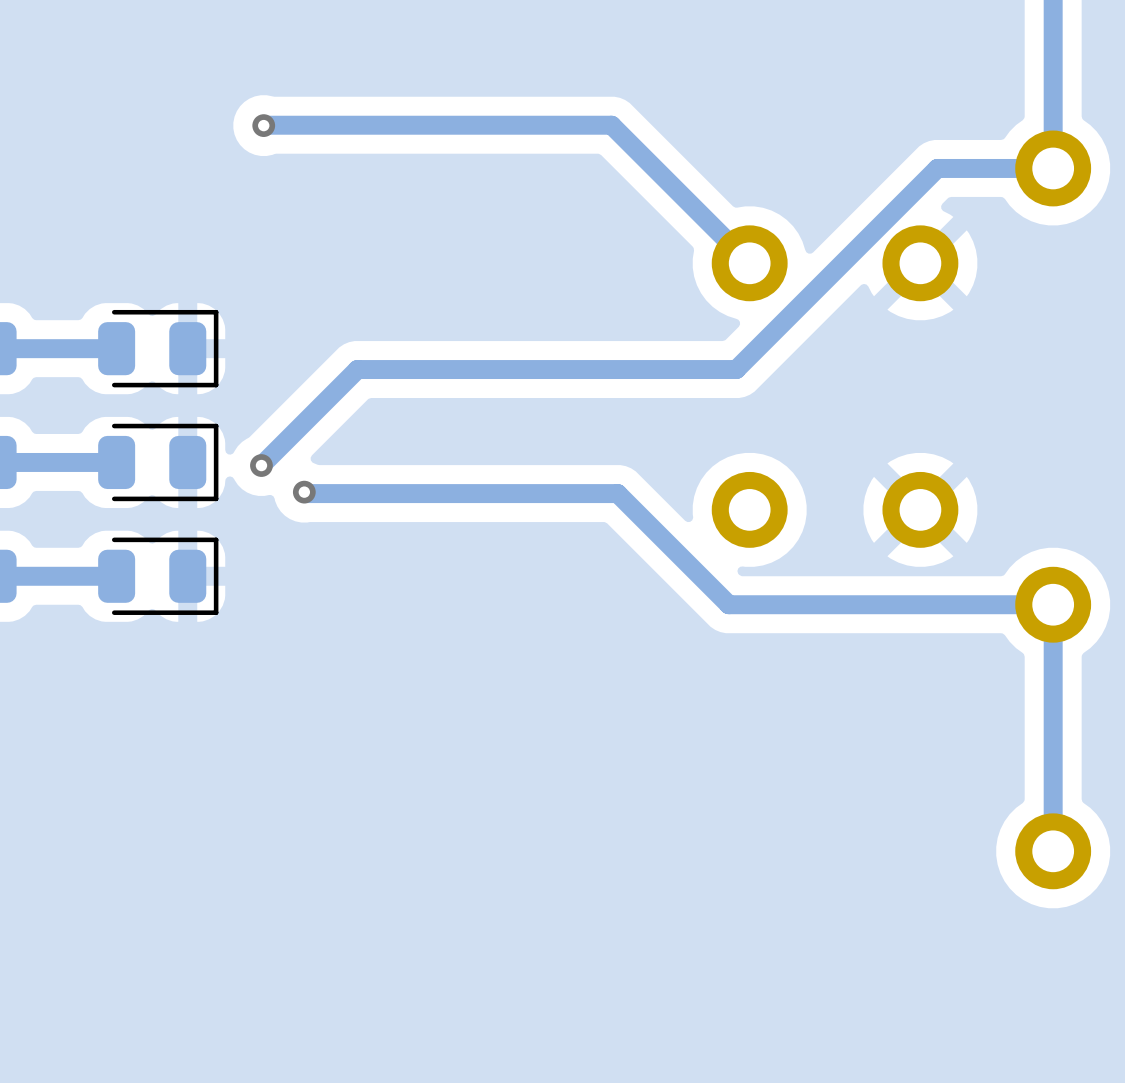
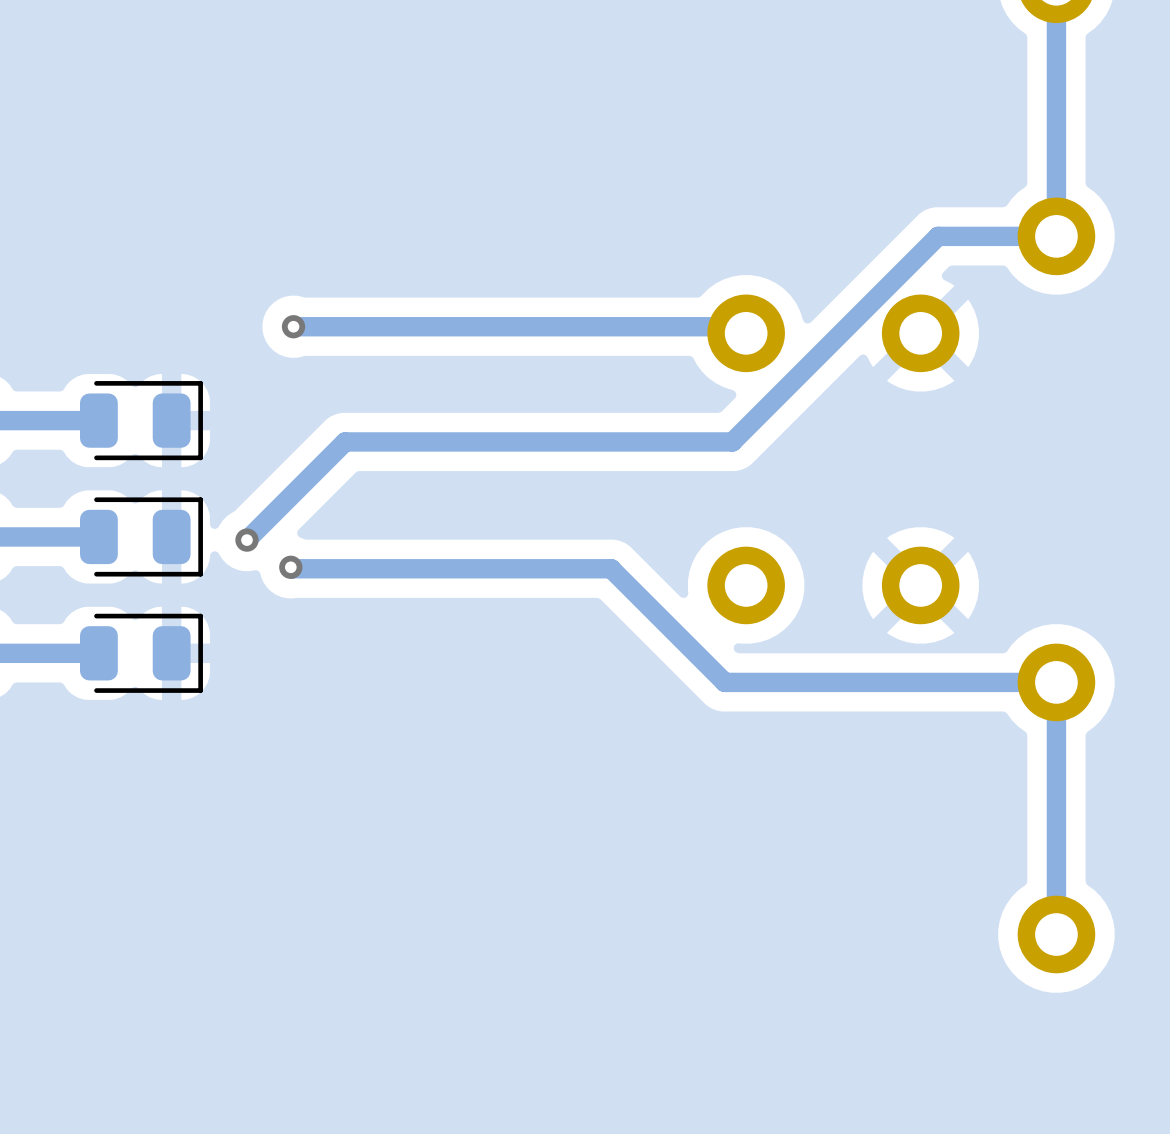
via position: (263, 125) -> (293, 326)
track: (264, 125) (611, 125) (743, 256) -> (293, 326) (739, 326)

